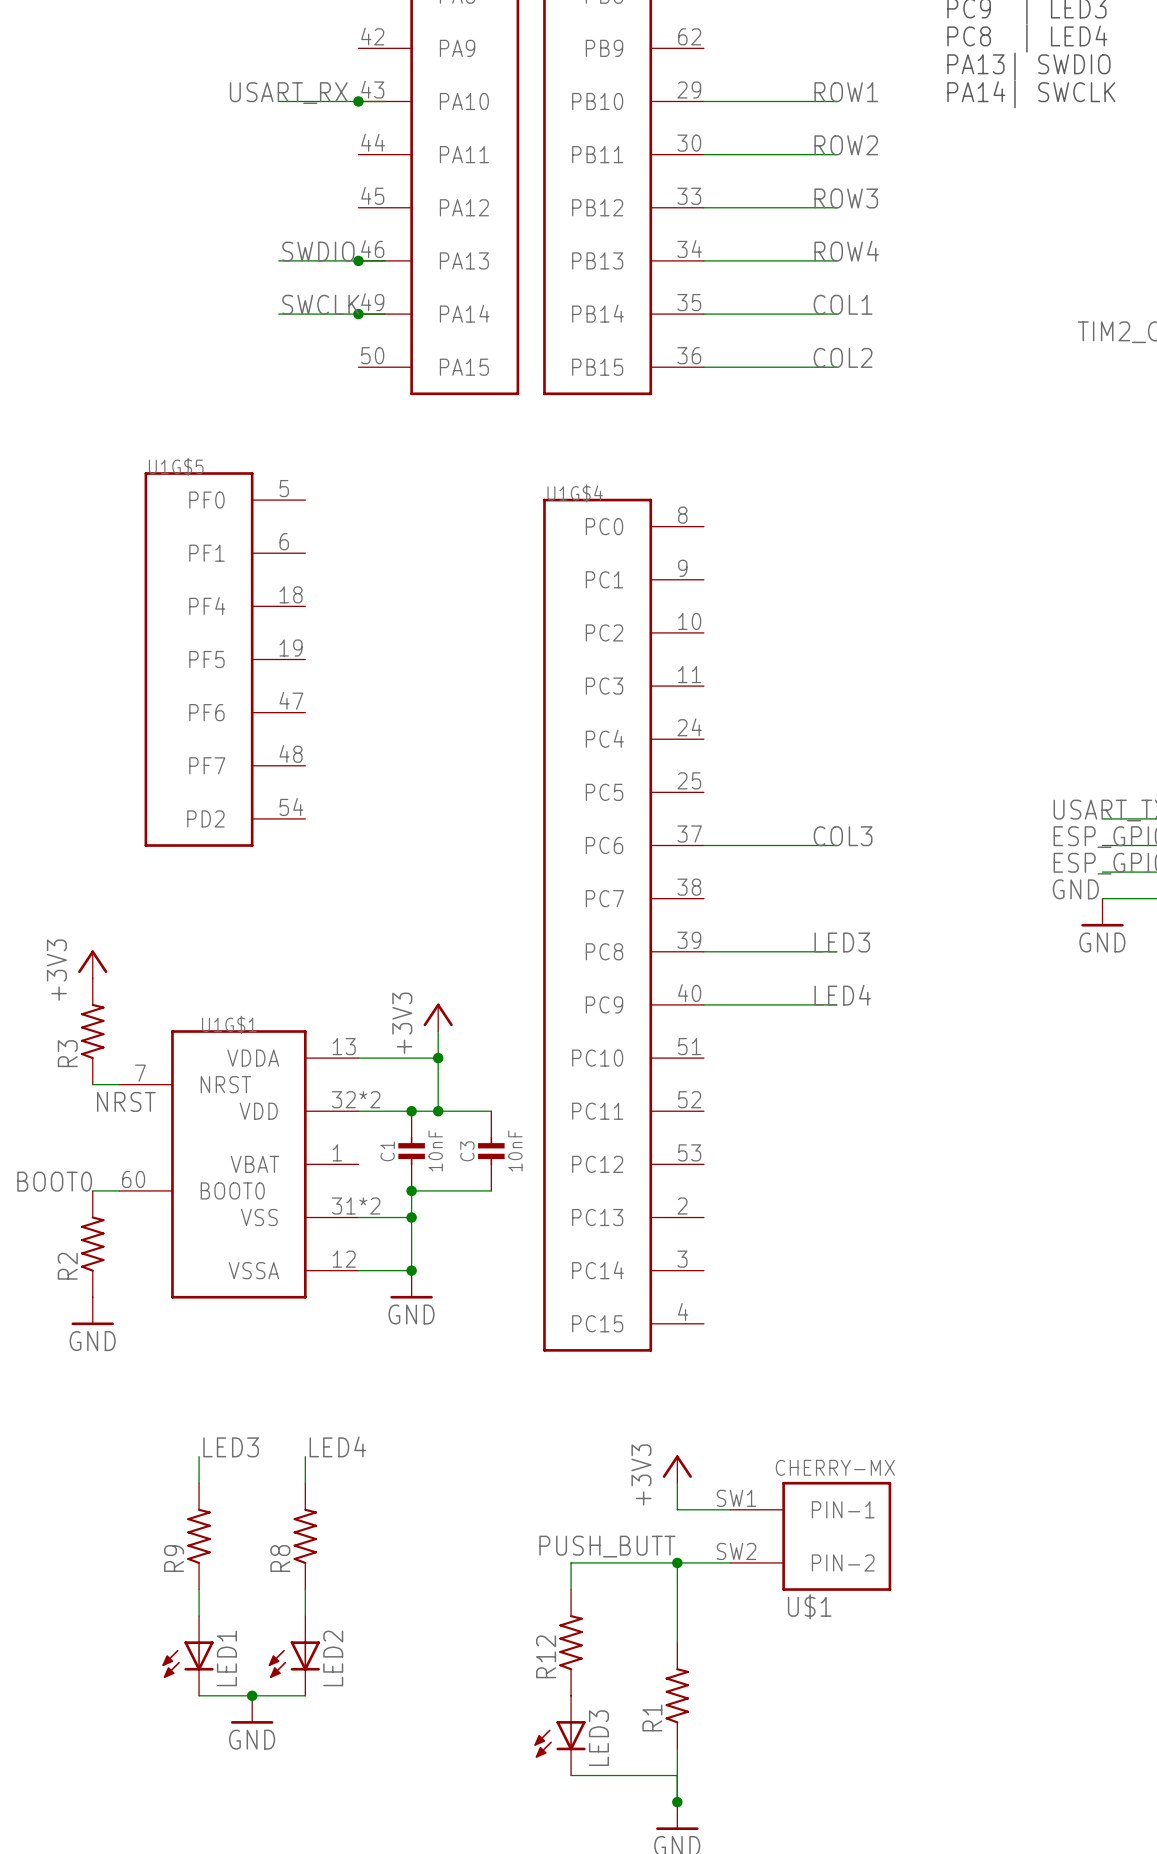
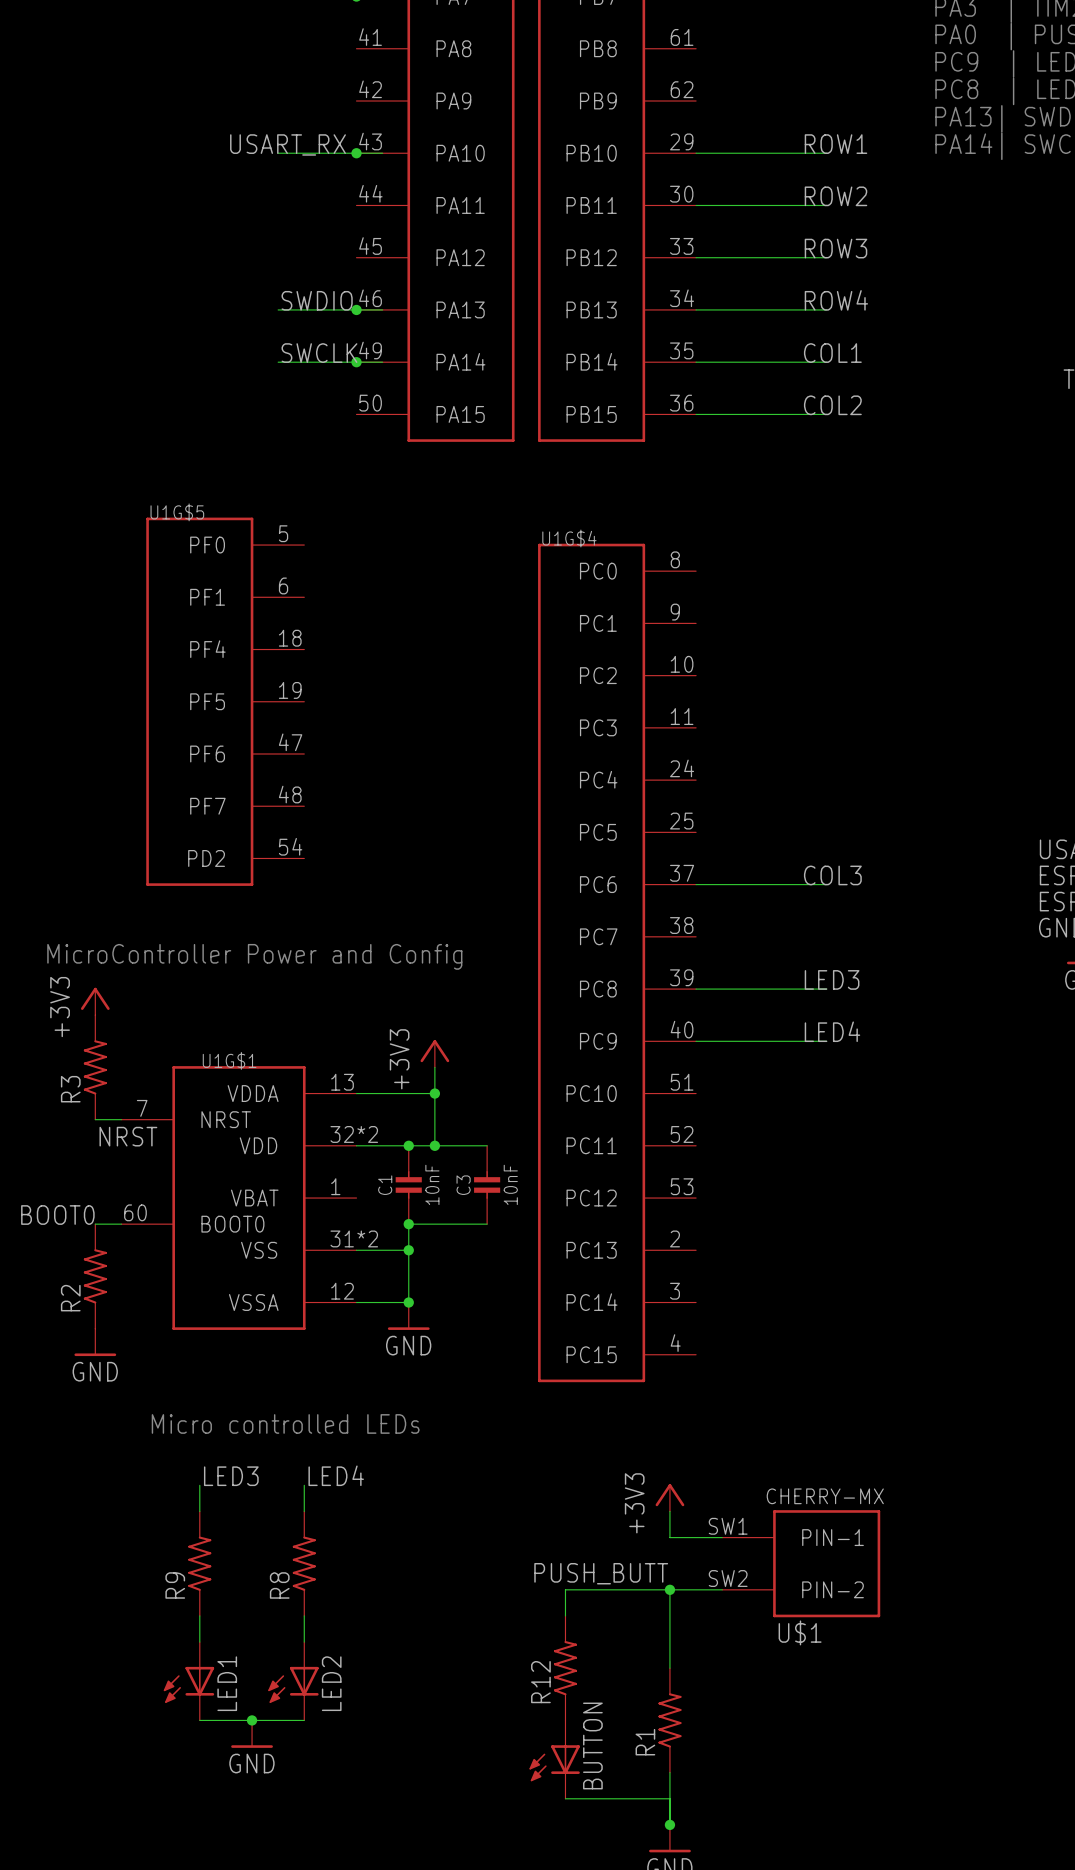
text: none -> MicroController Power and Config (254, 956)
text: none -> Micro controlled LEDs (285, 1423)
LED3 name: LED3 (598, 1738) -> BUTTON (592, 1745)

